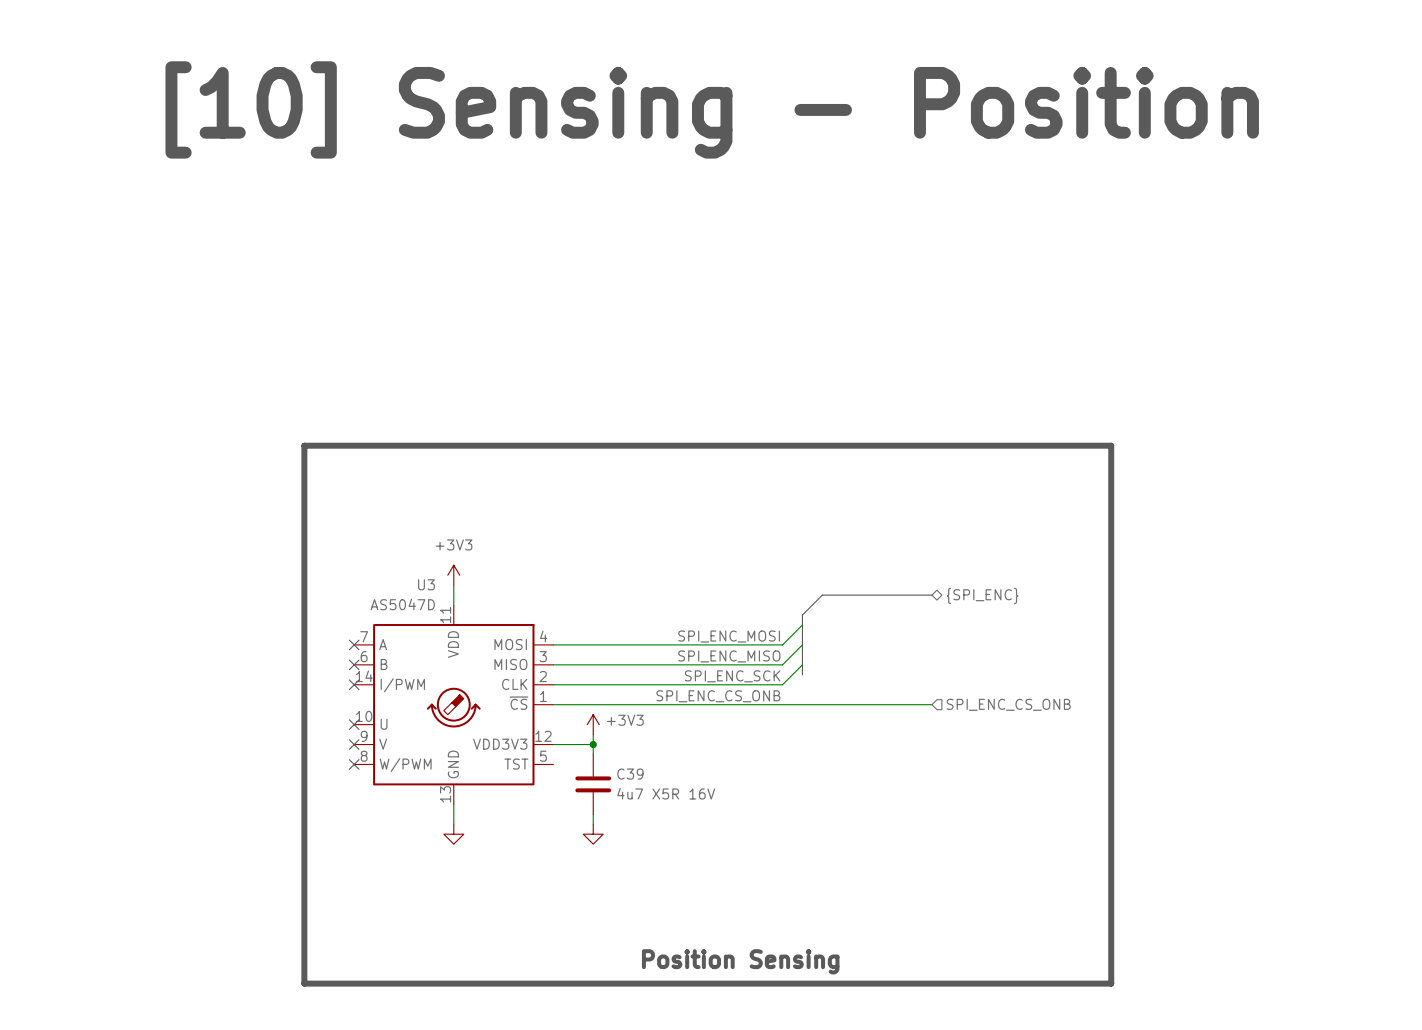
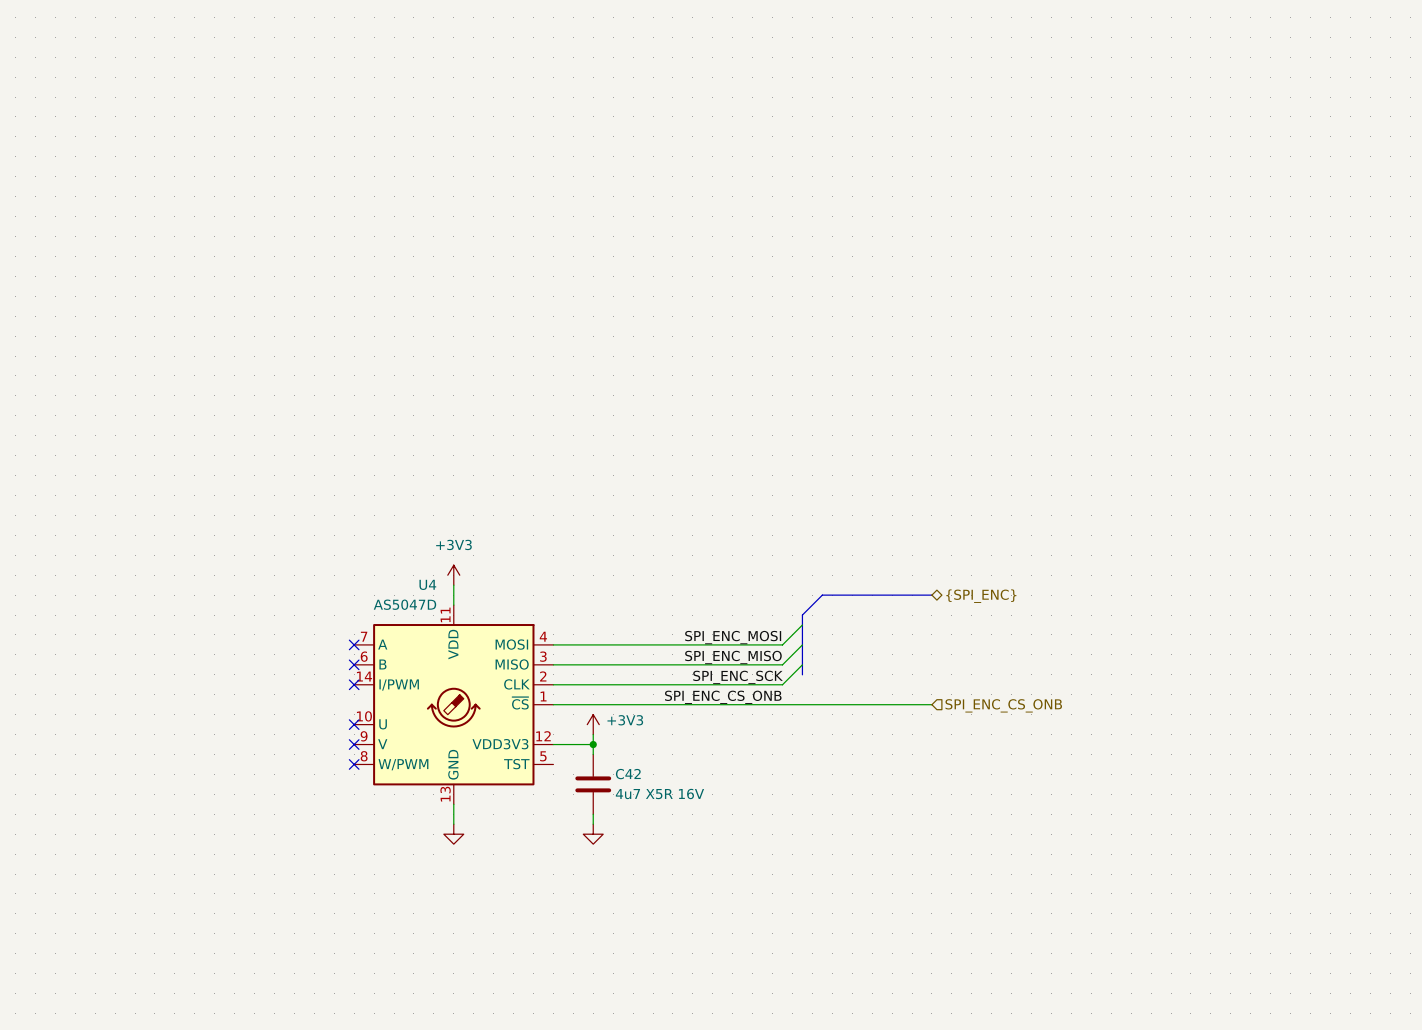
text: [10] Sensing - Position (712, 109) -> none
line: (304, 445) (1111, 445) (1111, 983) (304, 983) (304, 445) -> none
U3 name: U3 (426, 584) -> U4 (427, 584)
C39 name: C39 (630, 774) -> C42 (628, 774)
text: Position Sensing (740, 961) -> none

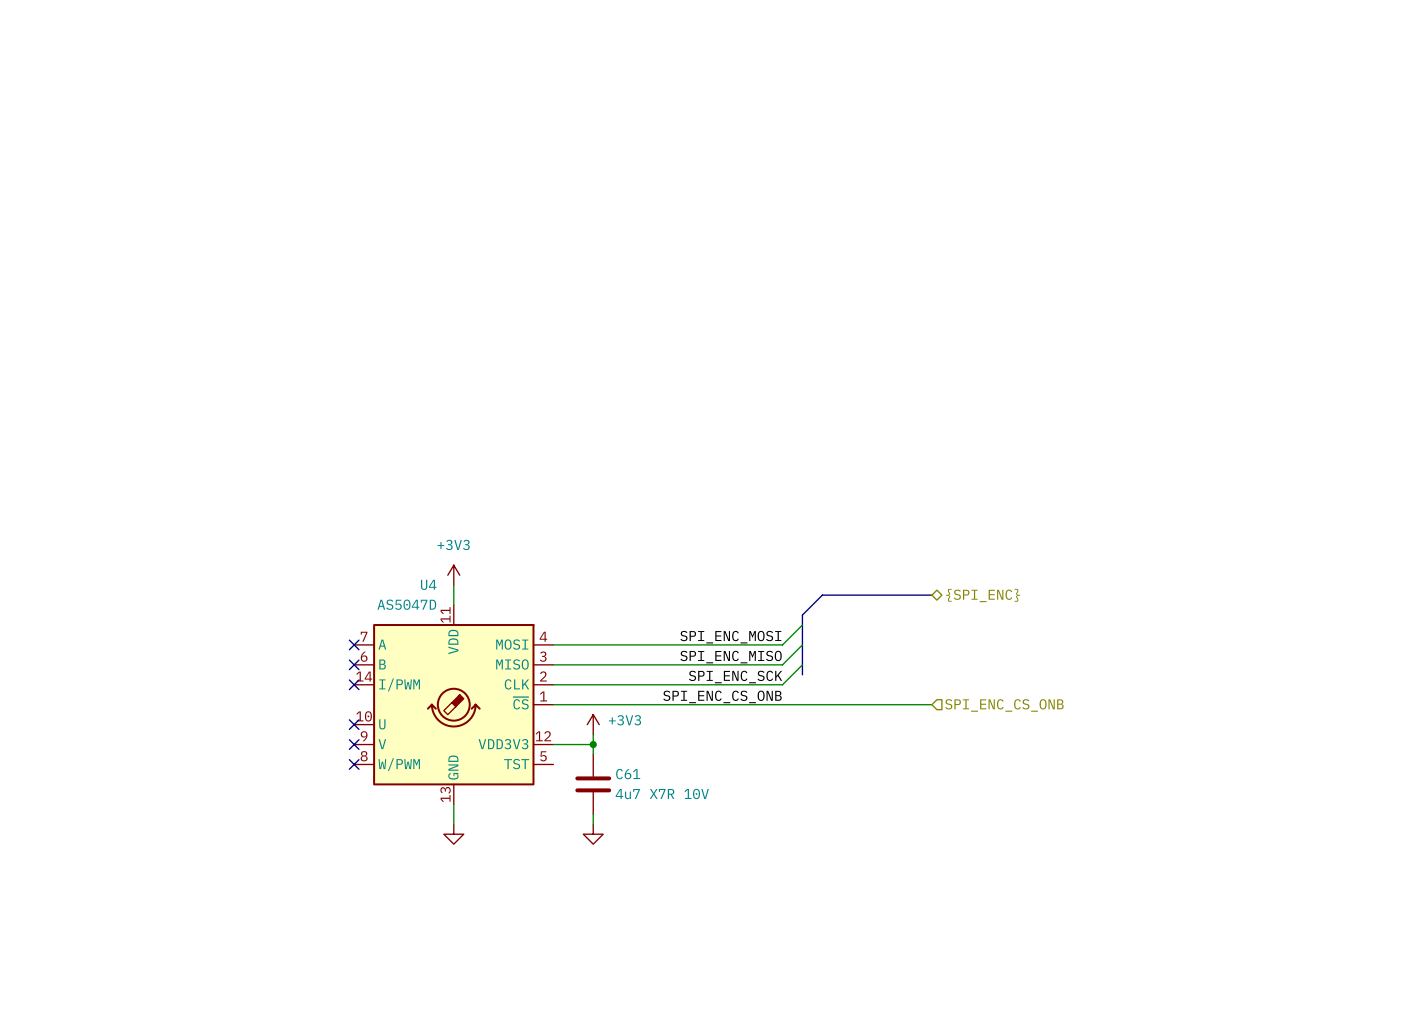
C42 name: C42 (628, 774) -> C61 (628, 774)
C42 value: 4u7 X5R 16V (659, 793) -> 4u7 X7R 10V (662, 793)

